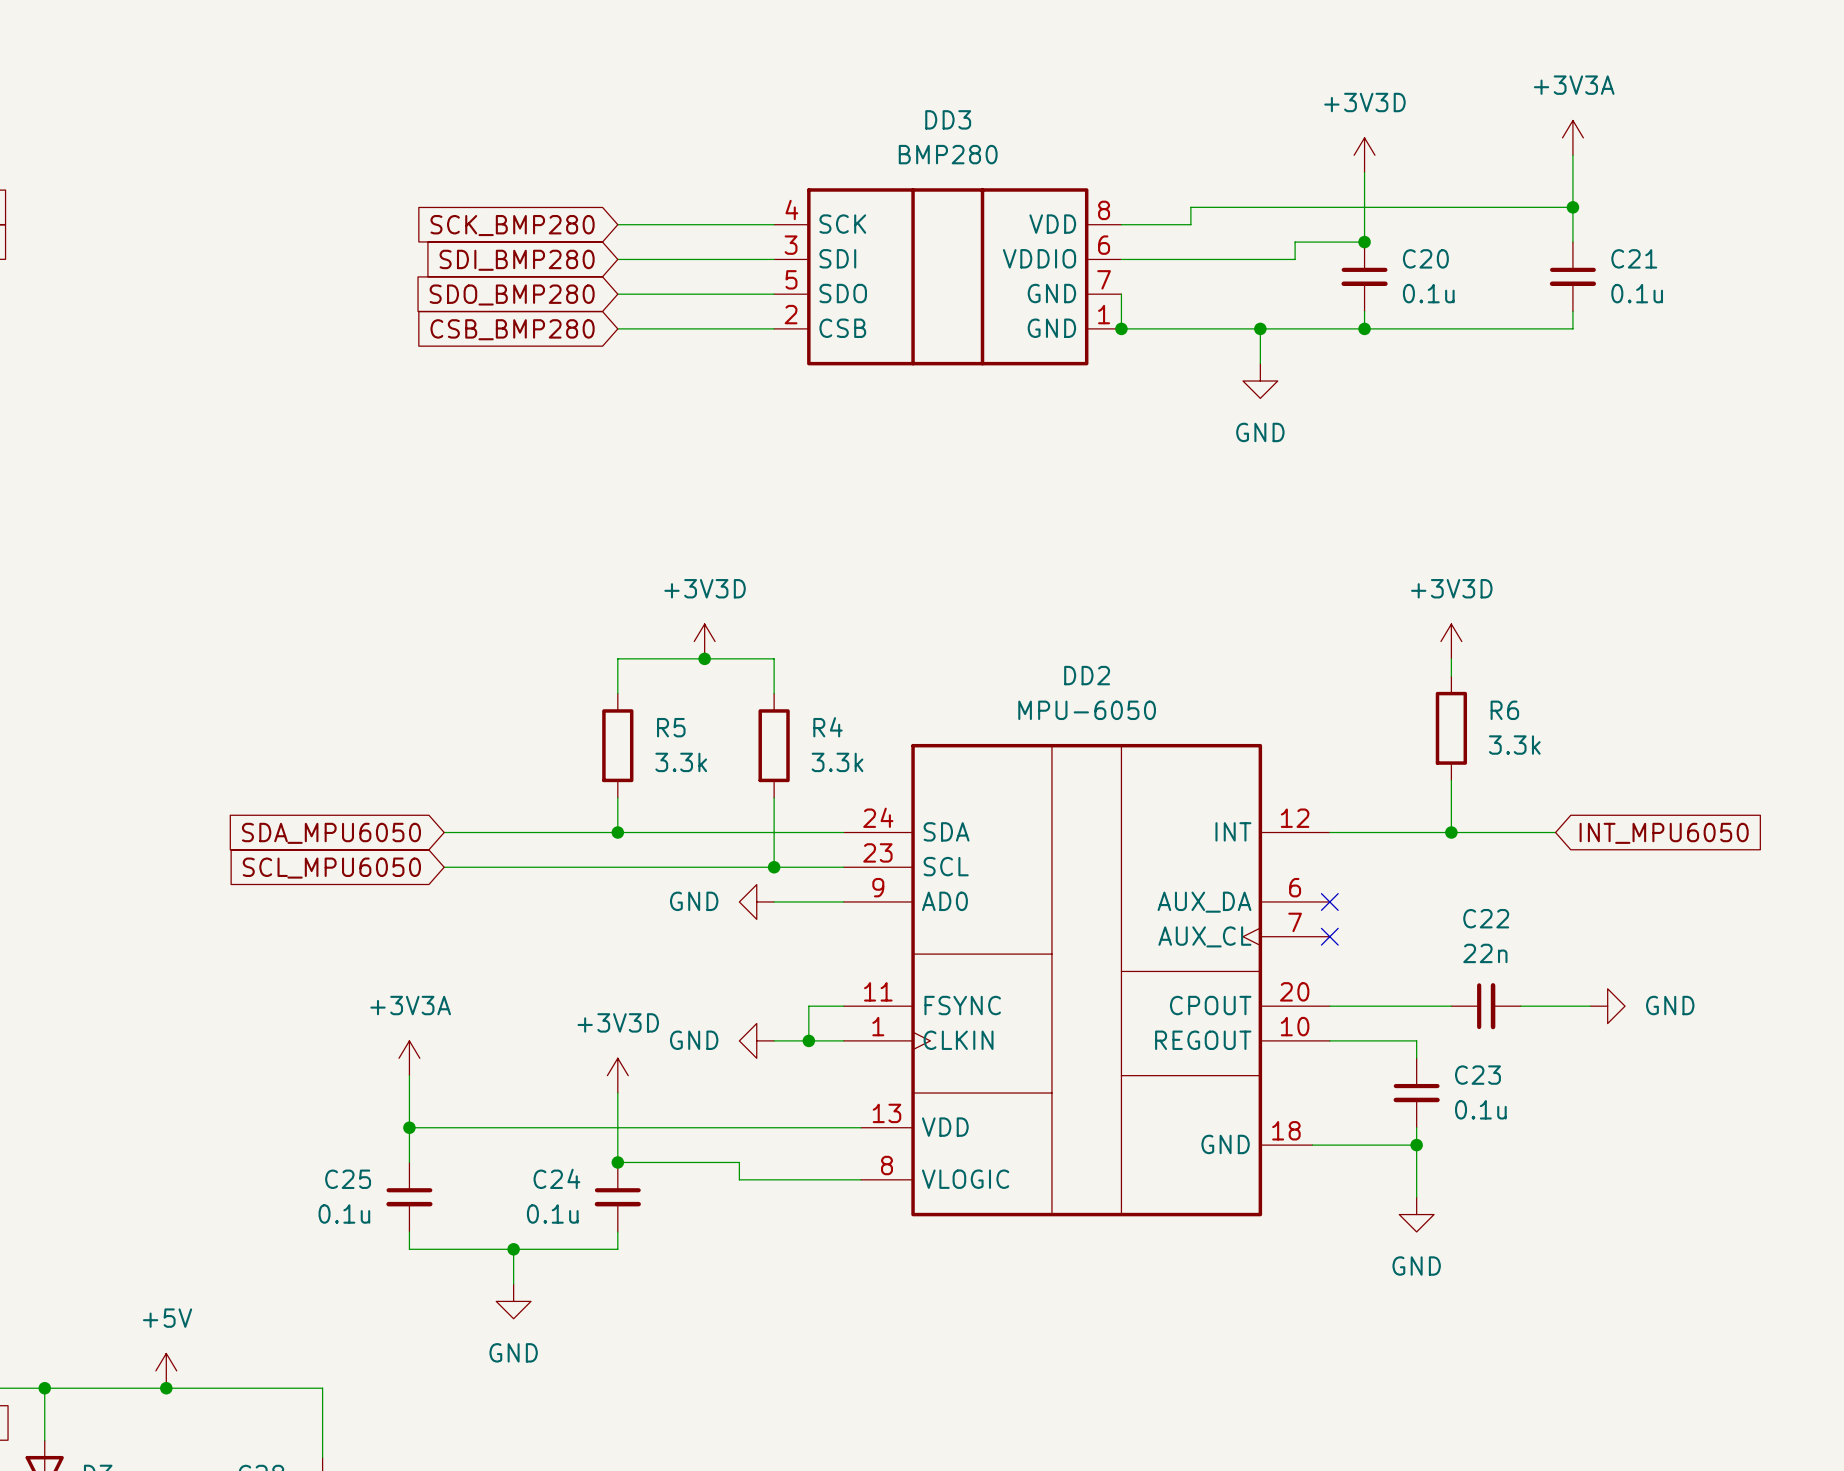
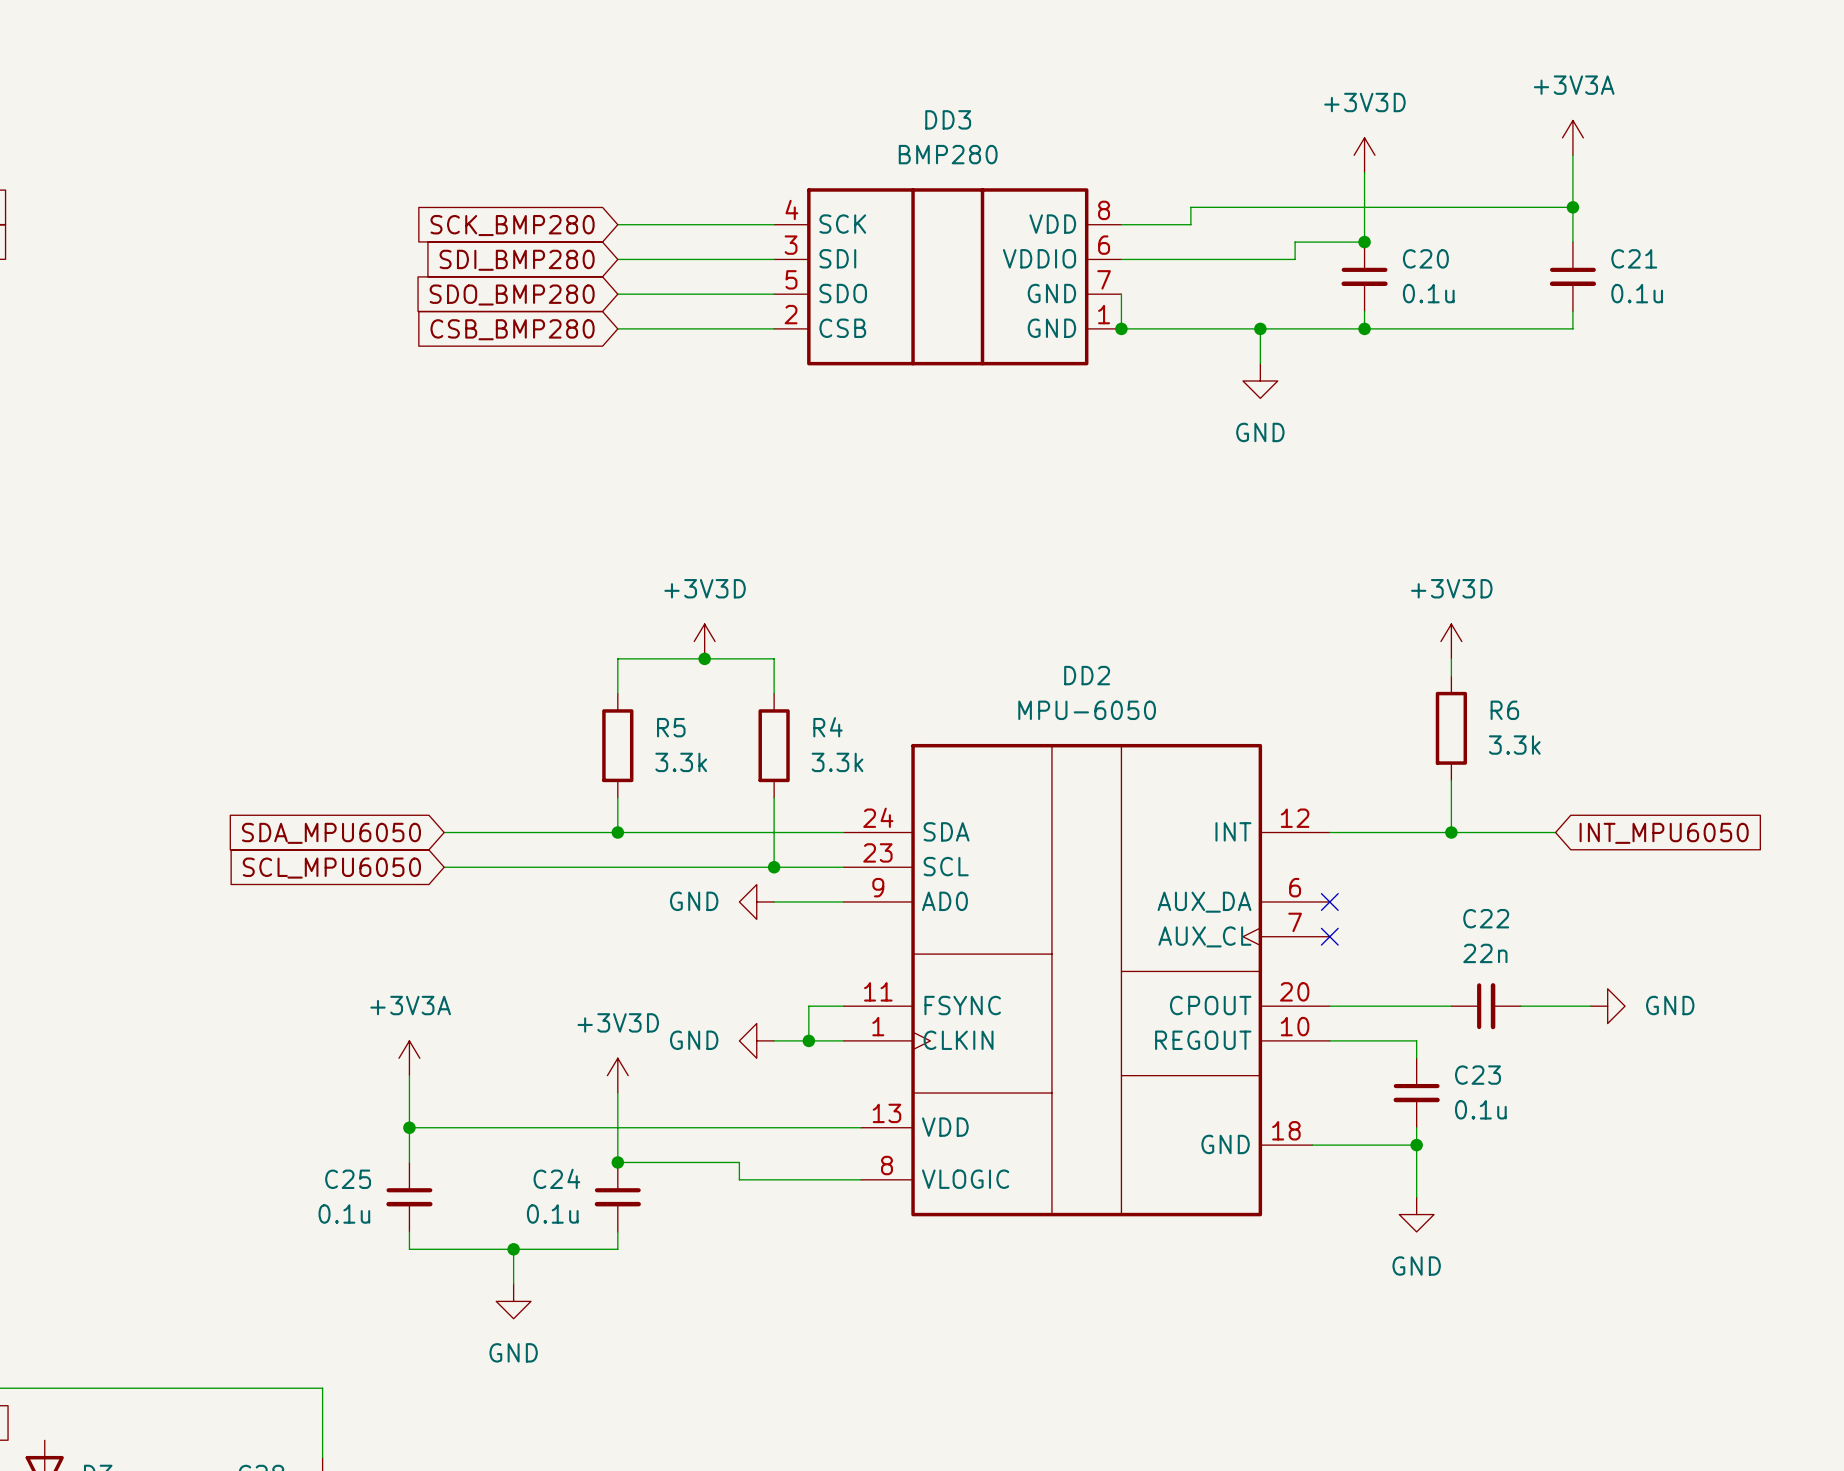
power symbol: +5V (166, 1370) -> none
wire: (44, 1388) (44, 1440) -> none
junction: (44, 1388) -> none
junction: (166, 1388) -> none

